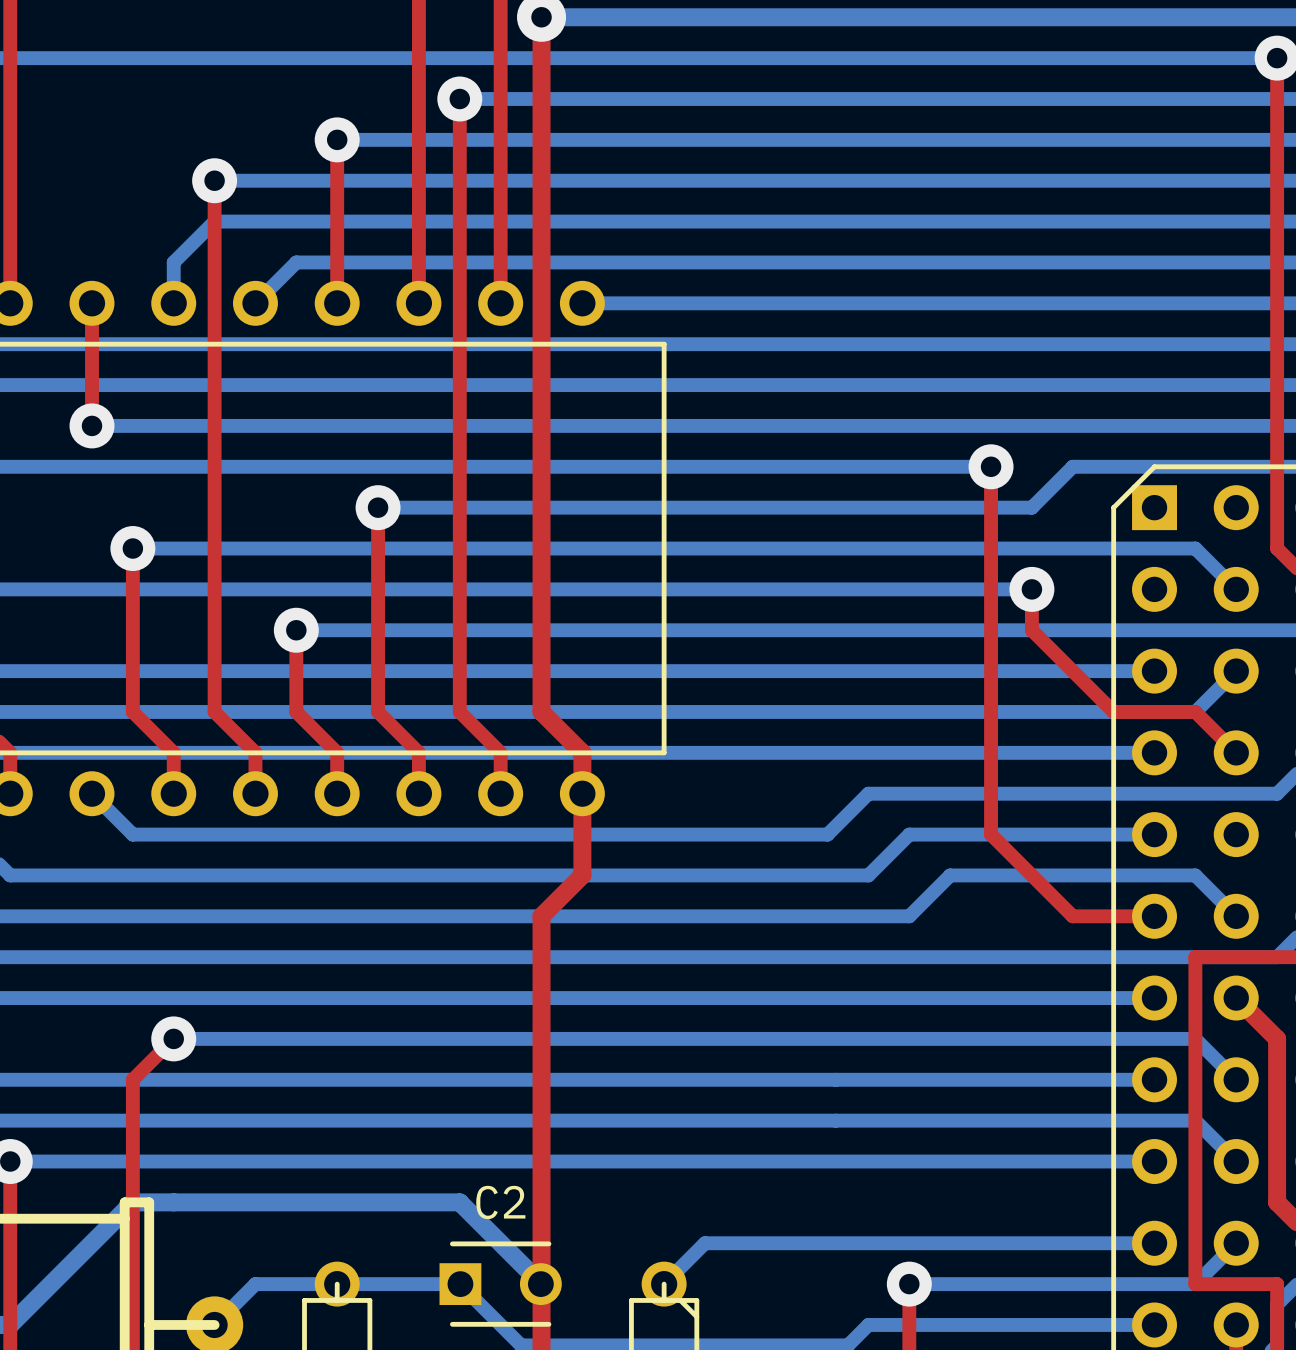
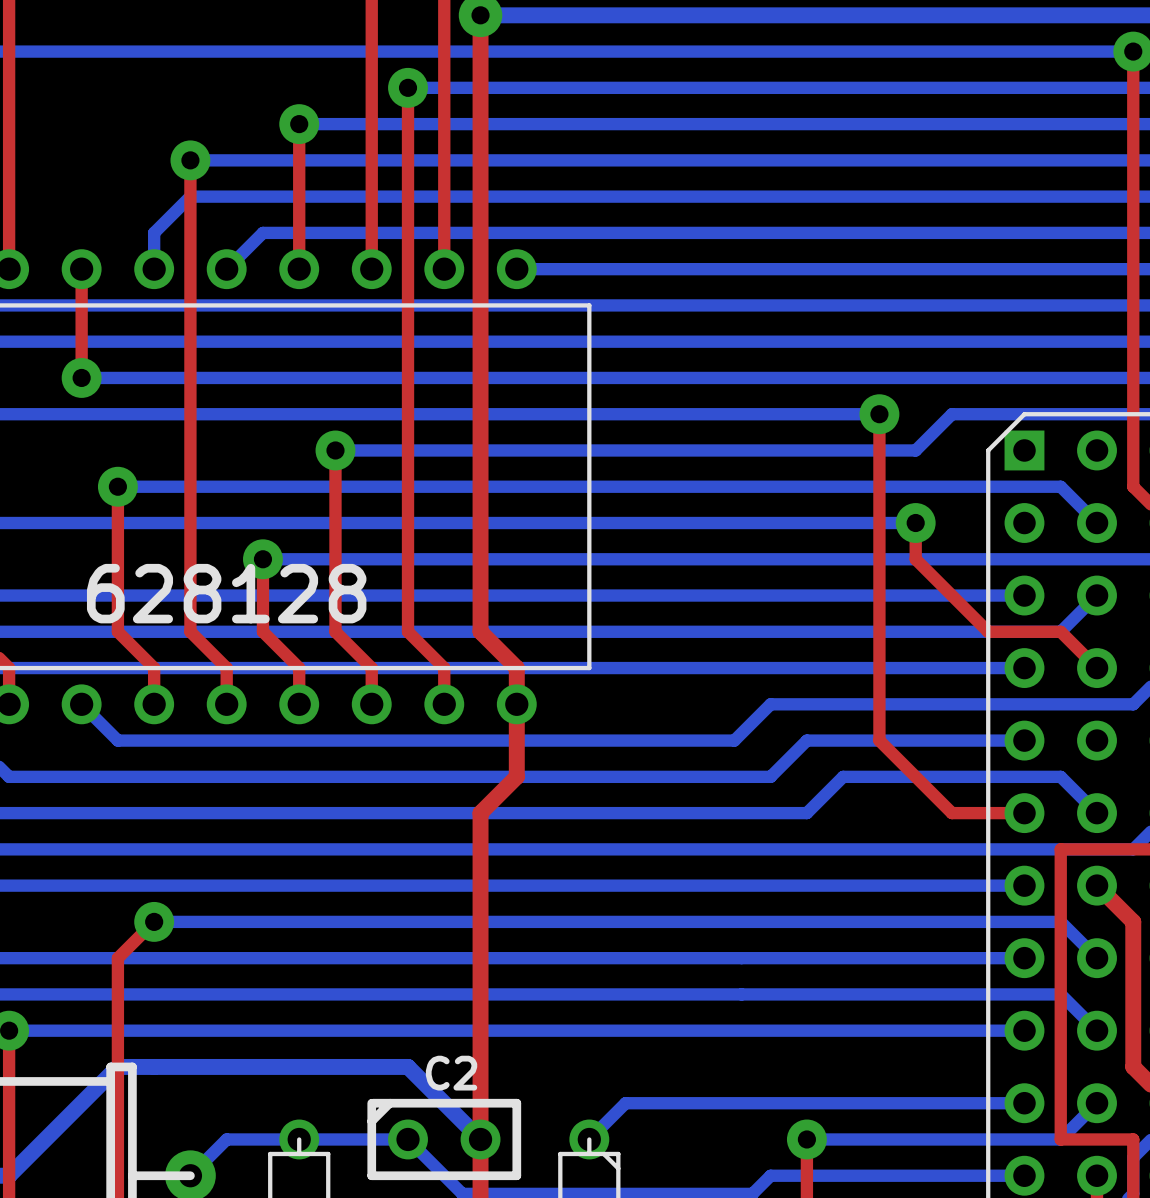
part value: none -> 628128 (226, 593)
C2 footprint: [439, 1241, 562, 1327] -> [367, 1098, 522, 1181]

